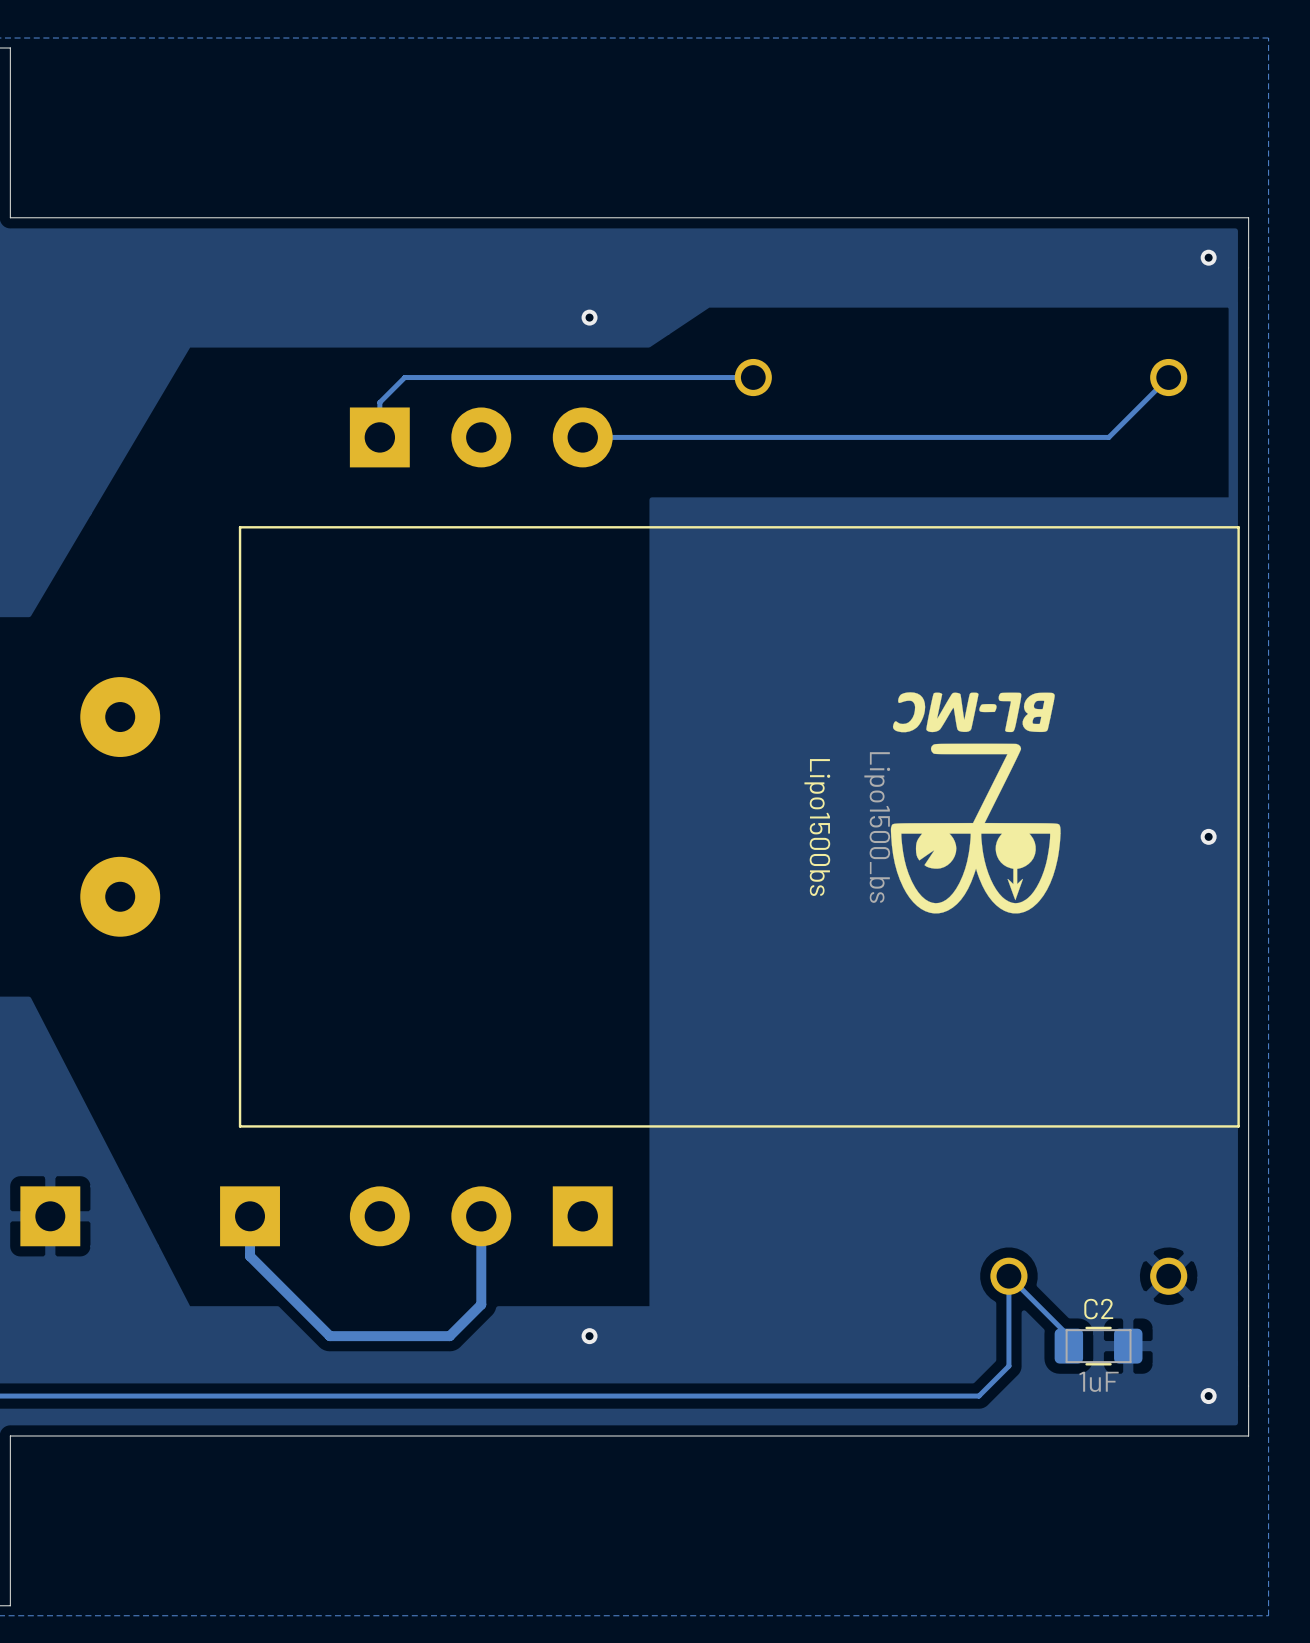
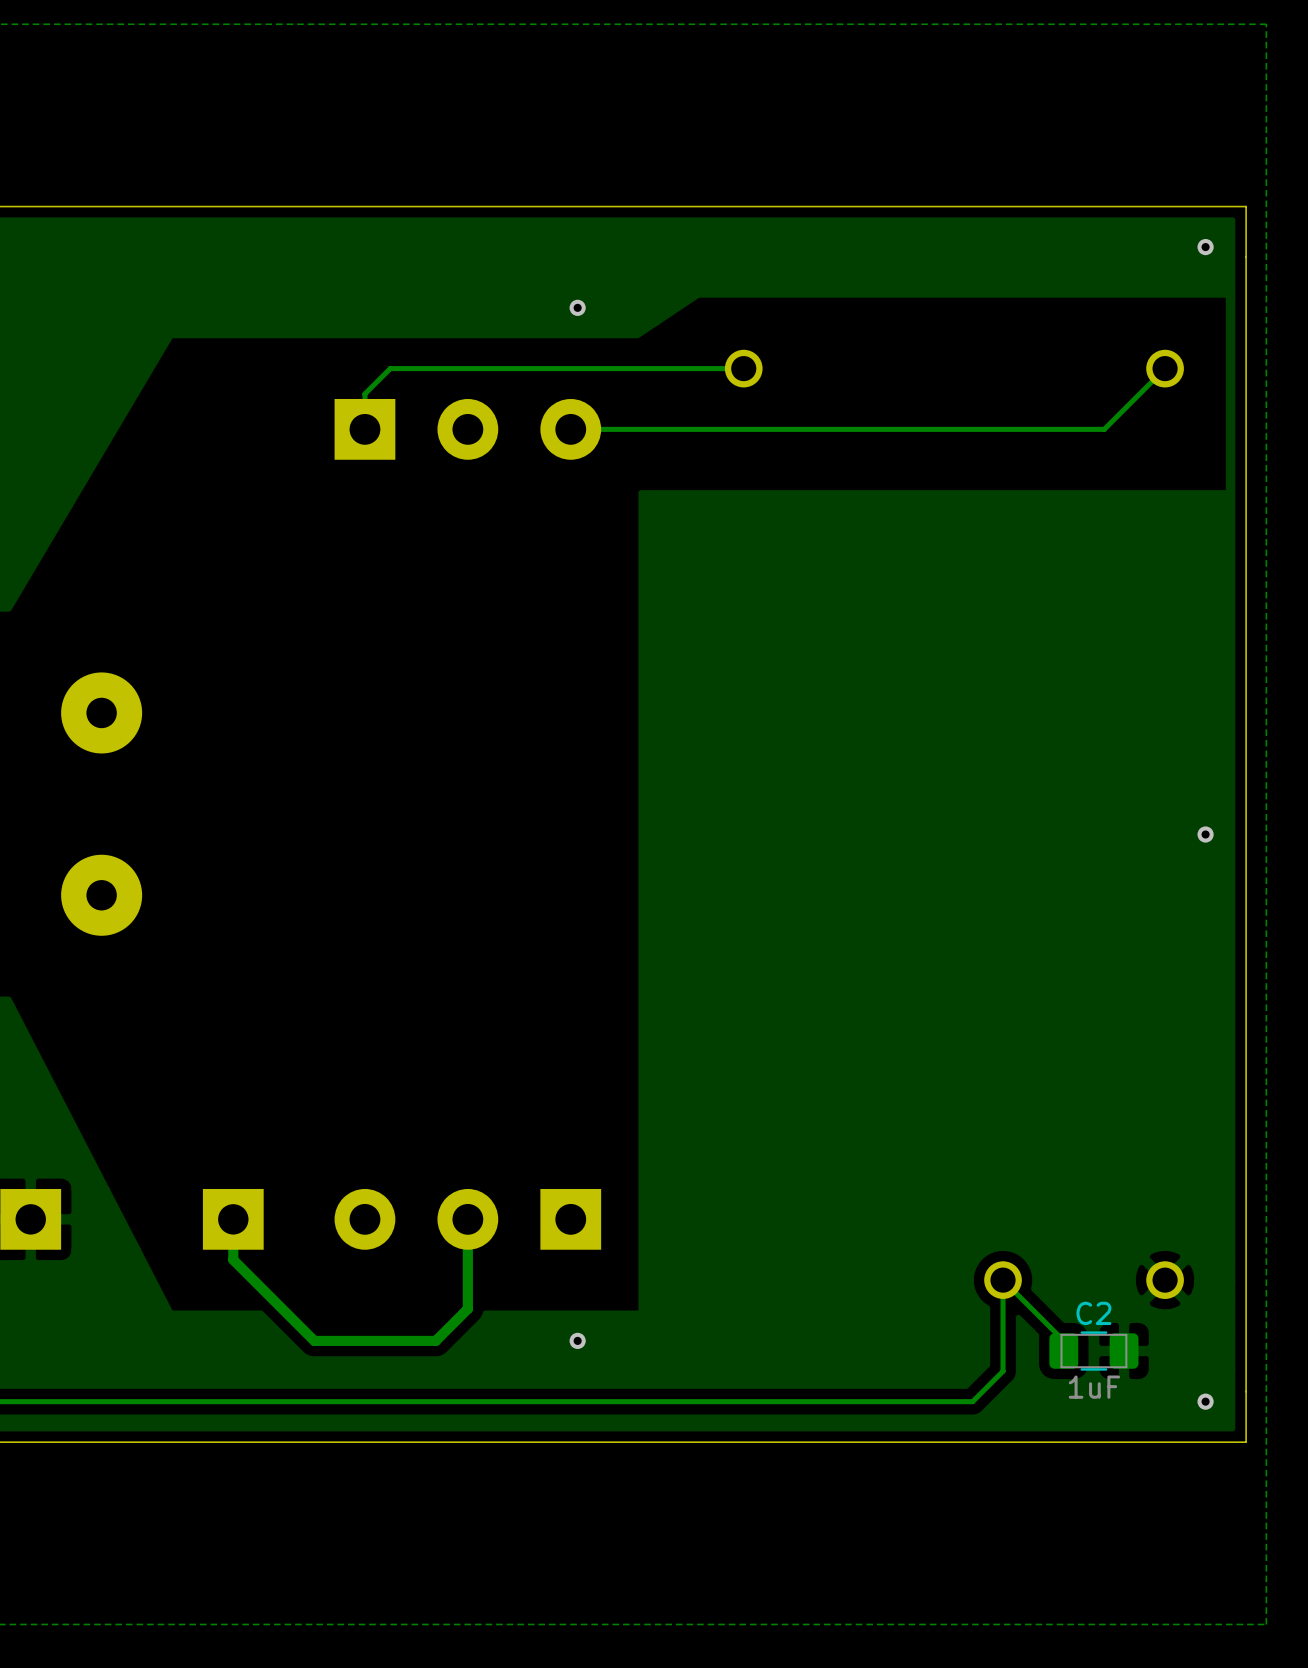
drawing: [890, 692, 1061, 914] -> none
Lipo1500bs: Lipo1500_bs (739, 826) -> none

